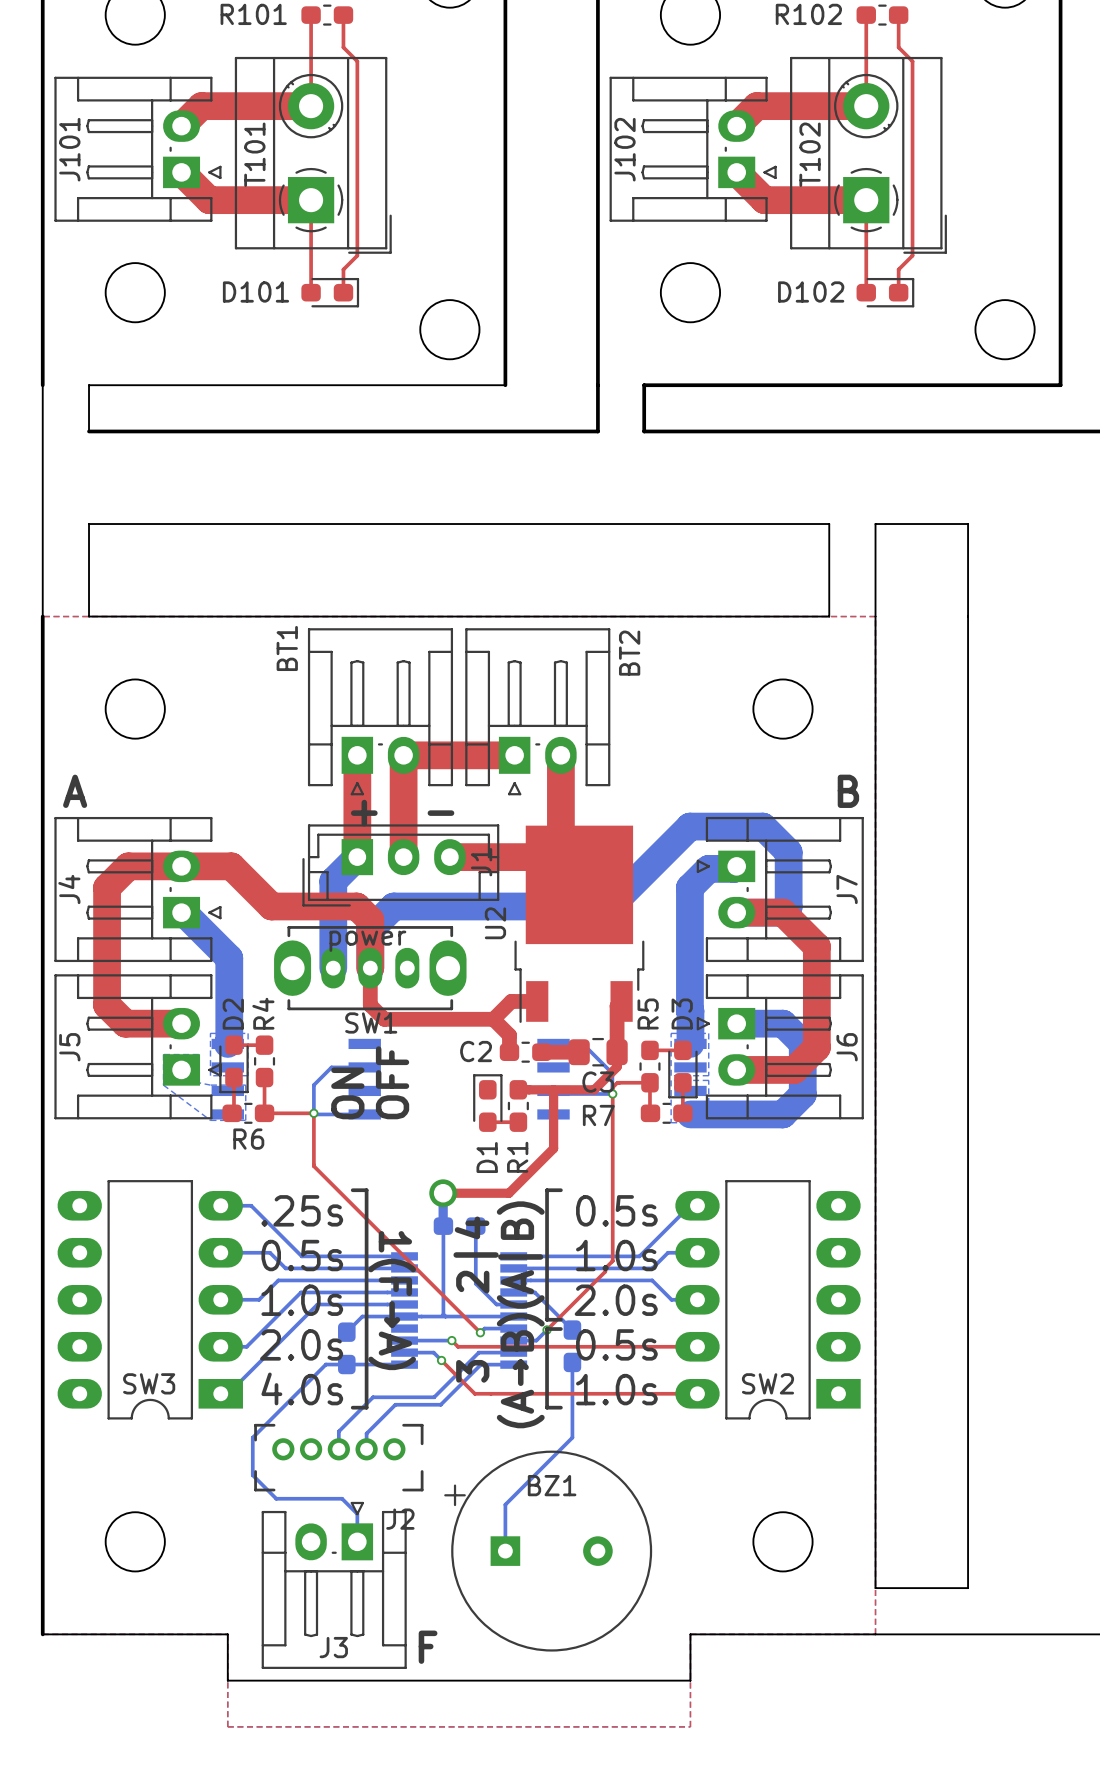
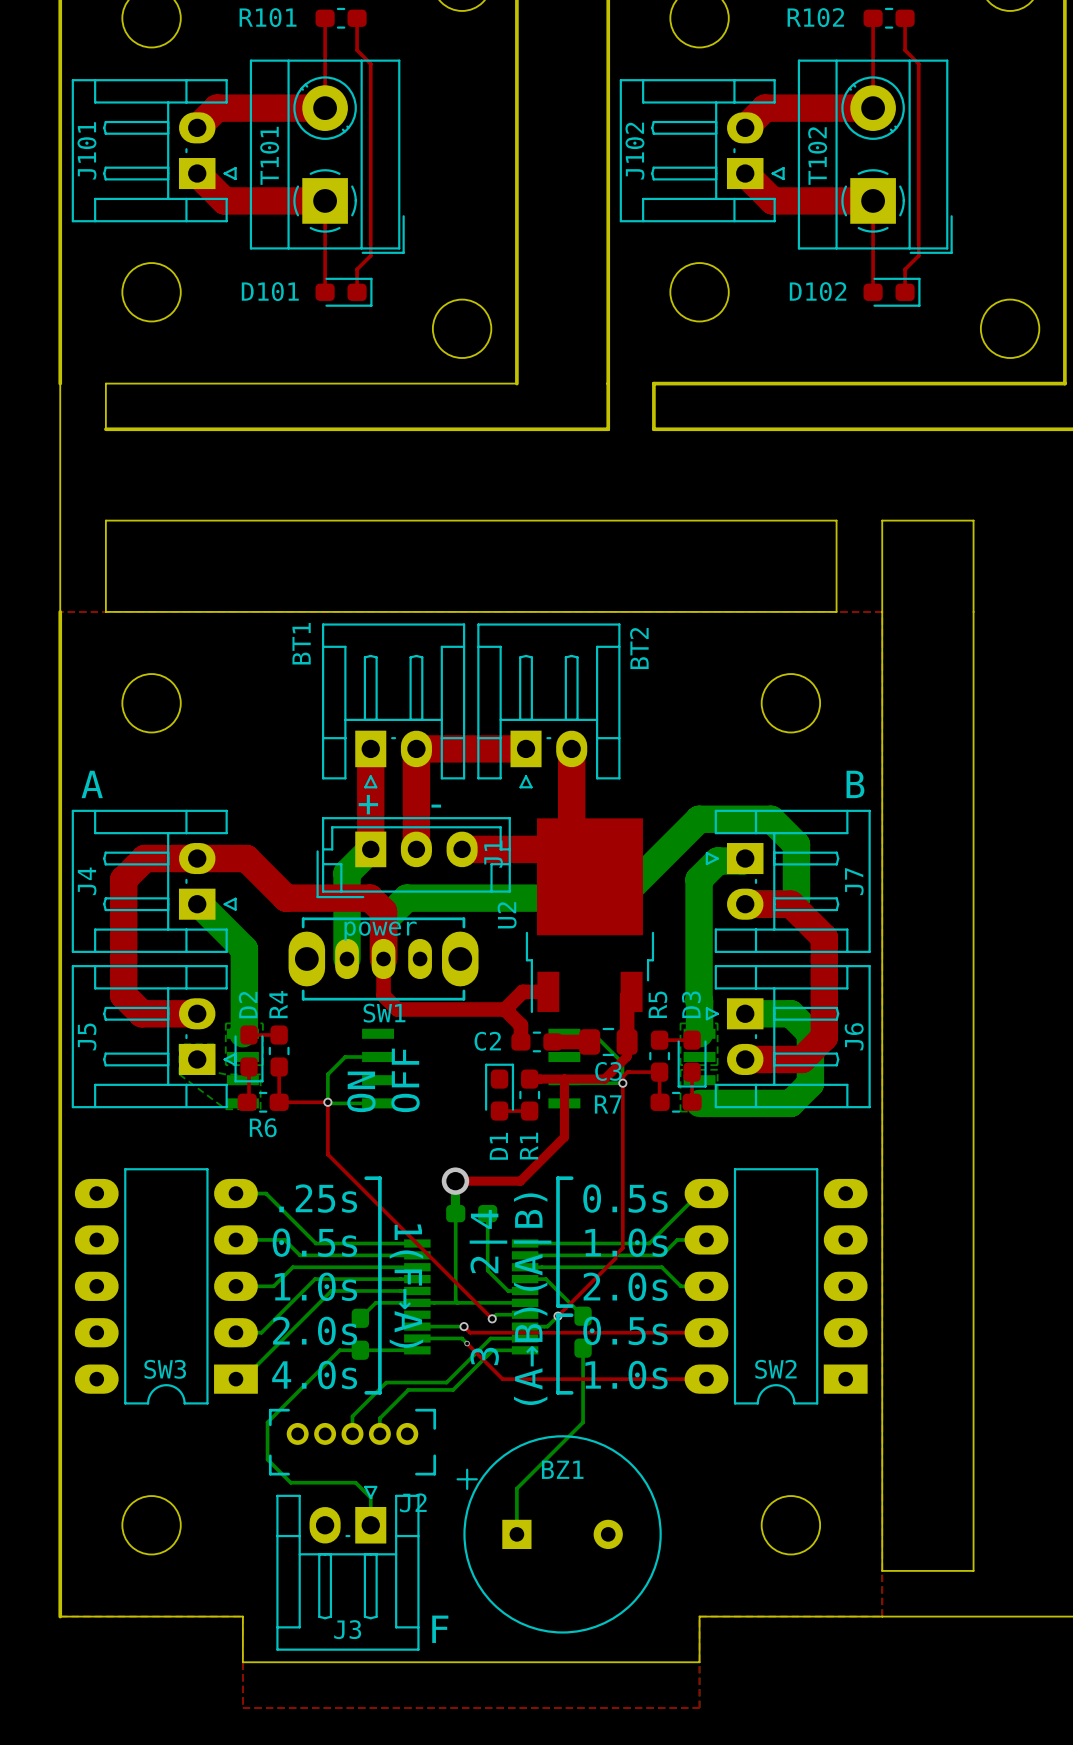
bottom track: (433, 1352) (441, 1360) -> (446, 1338) (462, 1338) (467, 1343)
via: none -> (467, 1343)
top track: (441, 1360) (474, 1393) (490, 1393) -> (467, 1343) (502, 1379)
via: (441, 1360) -> none

